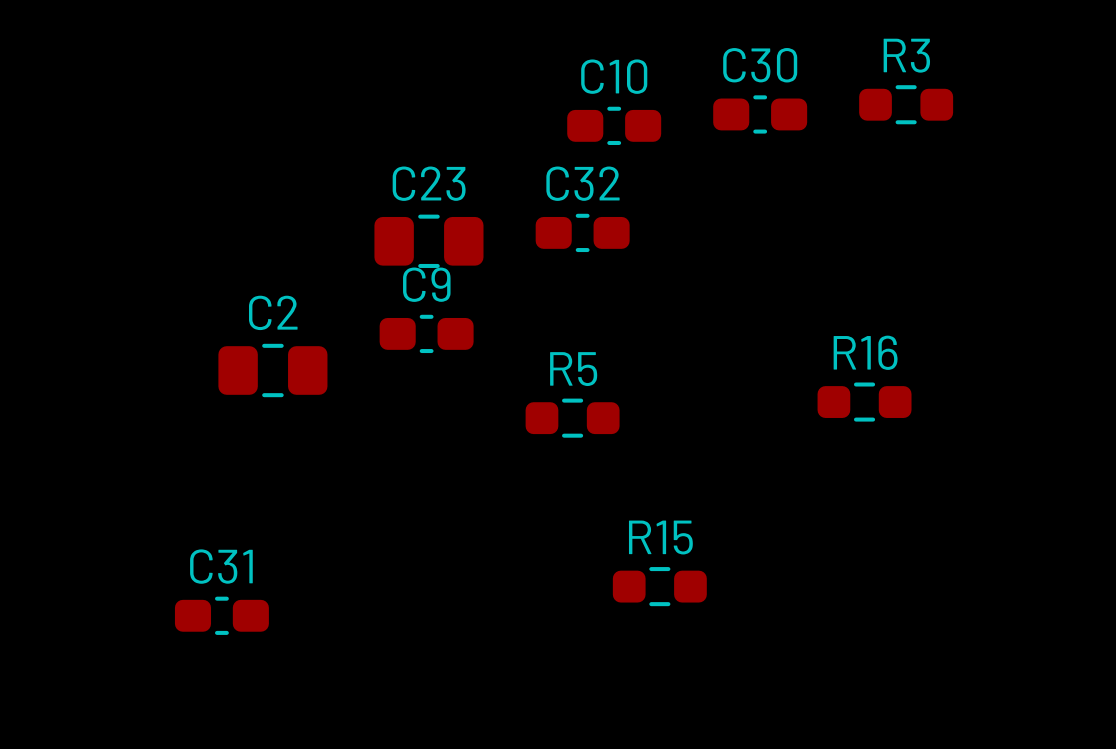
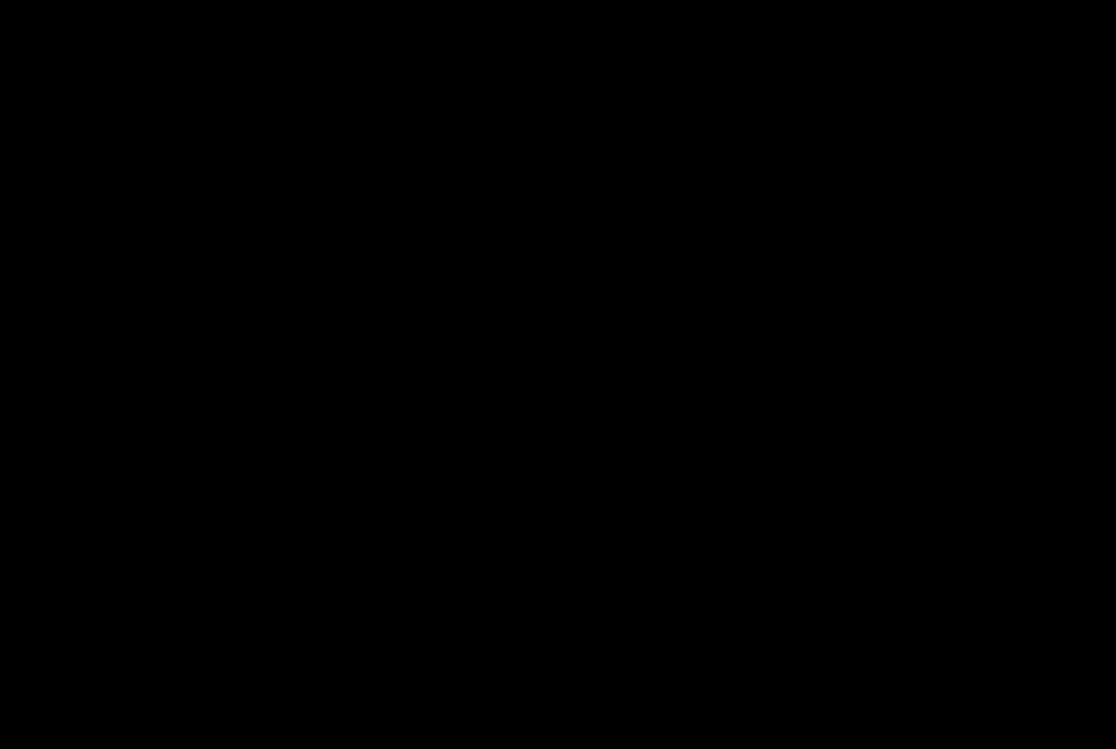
R3: (906, 104) -> none
C30: (760, 114) -> none
C10: (614, 125) -> none
C32: (582, 232) -> none
C23: (428, 241) -> none
C9: (426, 333) -> none
C2: (272, 370) -> none
R16: (864, 402) -> none
R5: (572, 418) -> none
R15: (659, 586) -> none
C31: (221, 615) -> none

